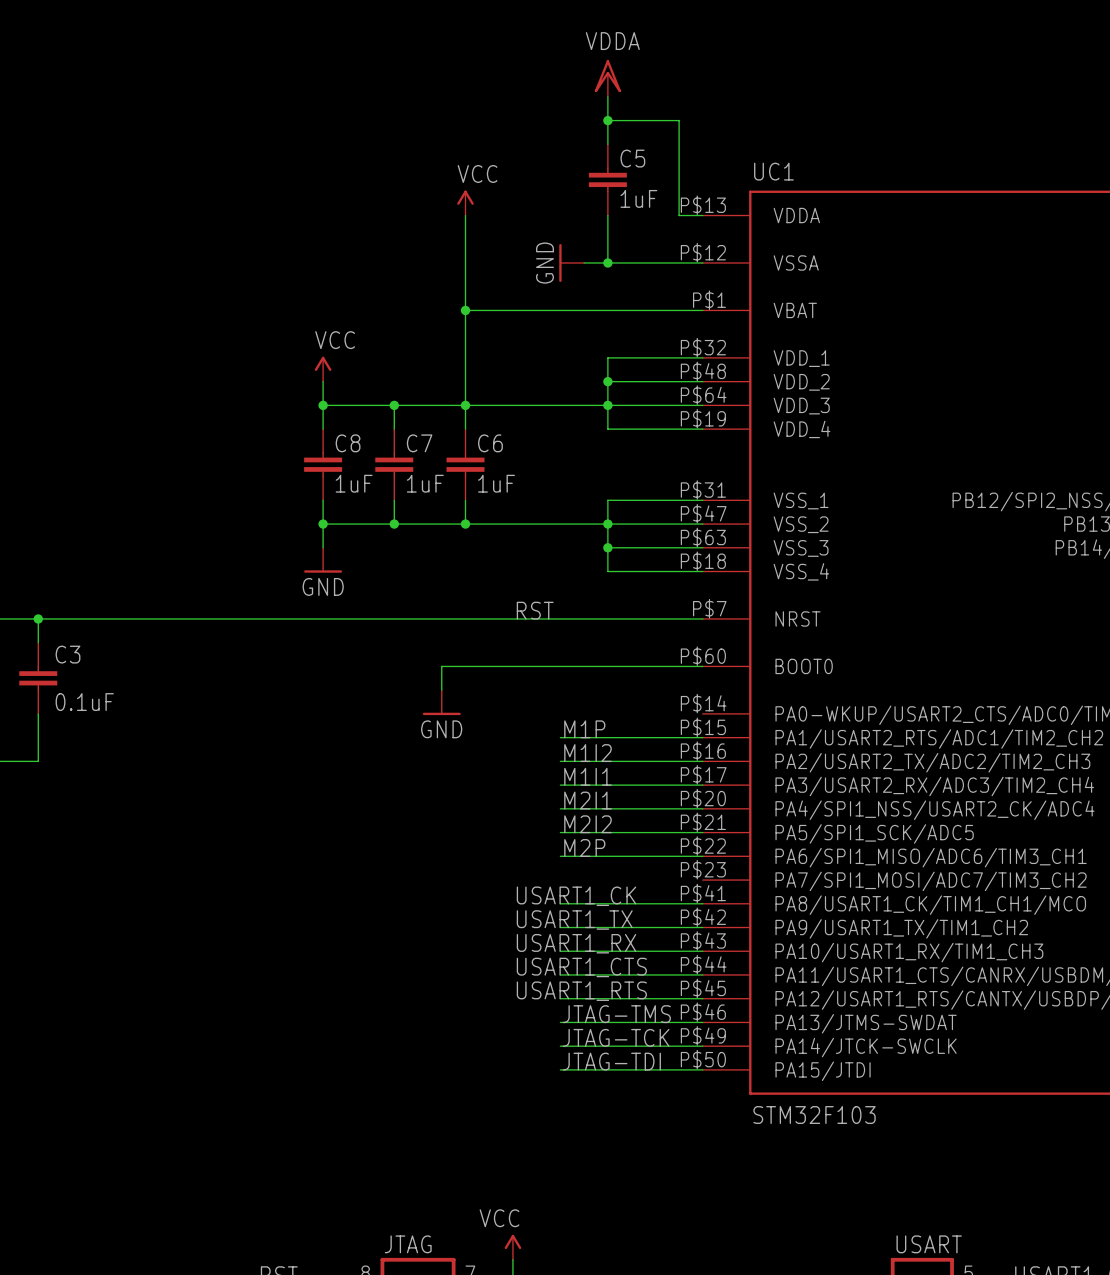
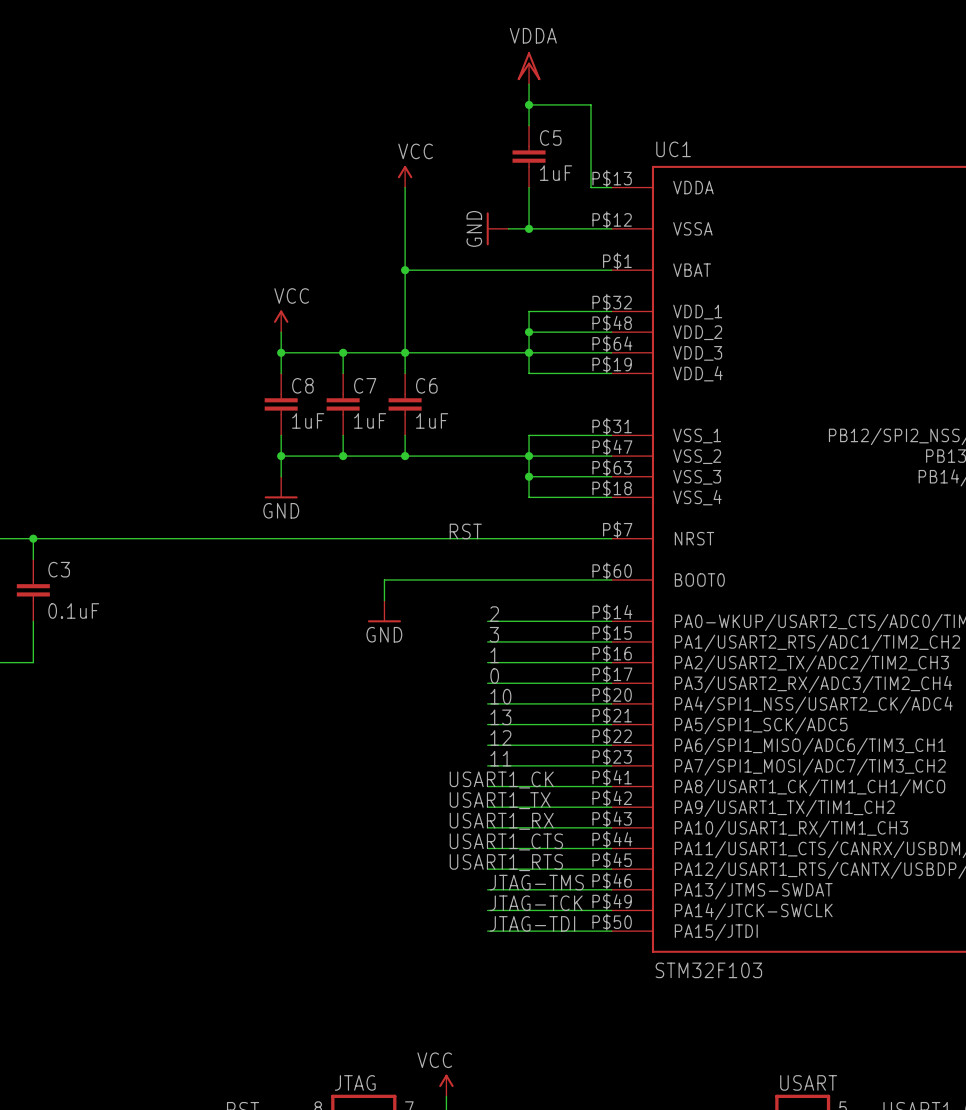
label: none -> 2 (494, 614)
wire: none -> (487, 621) (611, 621)
label: M1P (584, 729) -> 3 (494, 634)
label: M1I2 (588, 753) -> 1 (494, 655)
label: M1I1 (588, 776) -> 0 (494, 676)
label: M2I1 (588, 800) -> 10 (500, 696)
label: M2I2 (588, 824) -> 13 (500, 717)
label: M2P (584, 848) -> 12 (500, 738)
label: none -> 11 (500, 758)
wire: none -> (487, 765) (611, 765)

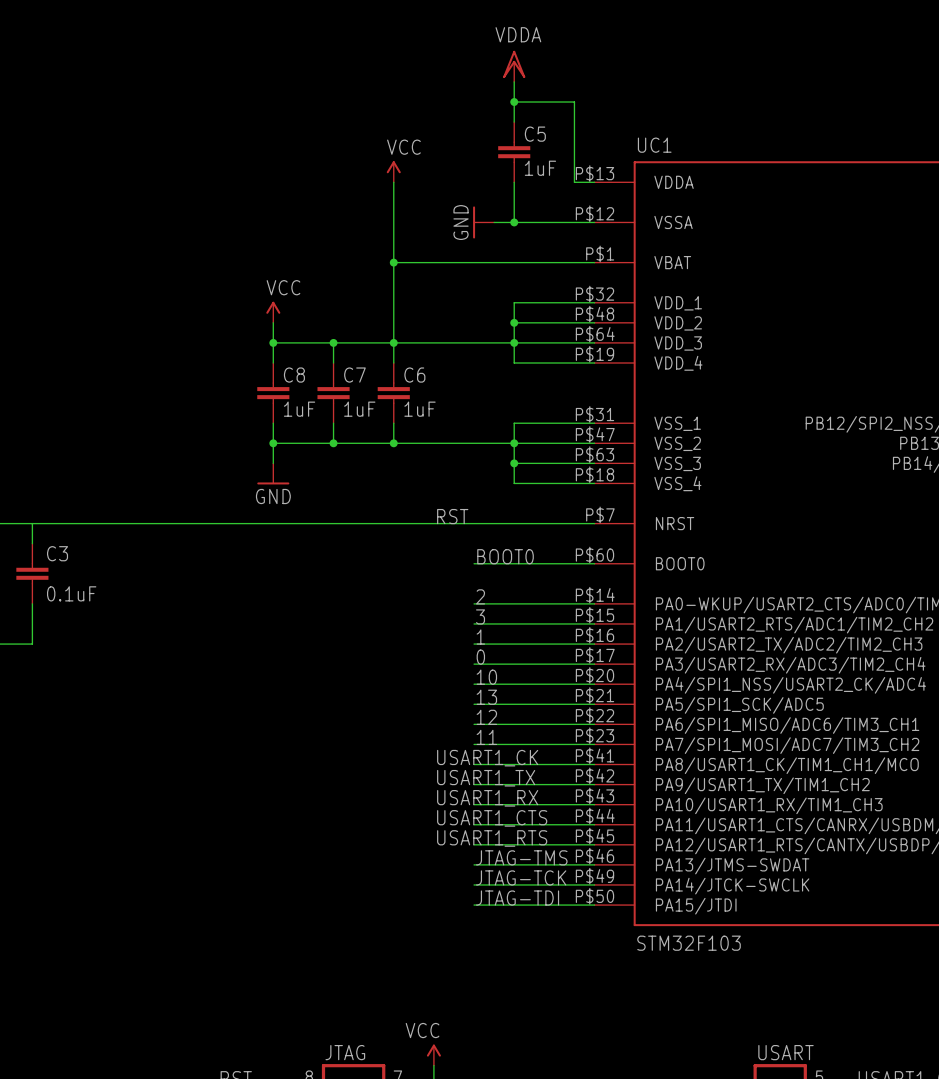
junction: (33, 538) -> none
label: none -> BOOT0 (505, 556)
wire: (487, 579) (384, 579) (384, 600) -> none
power symbol: GND (384, 611) -> none

